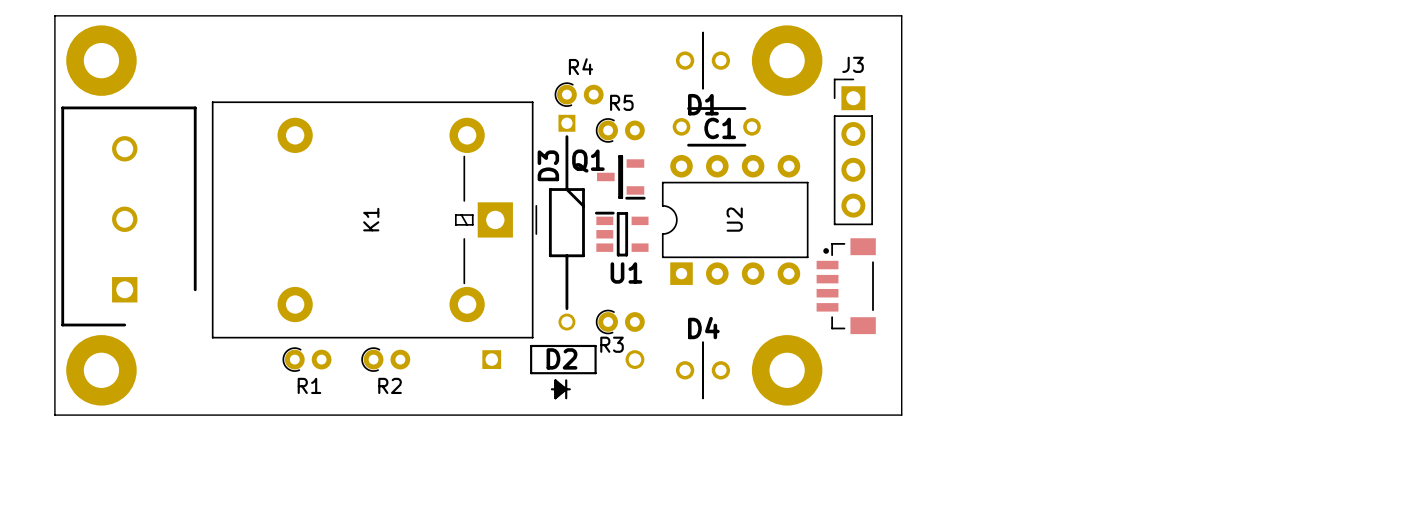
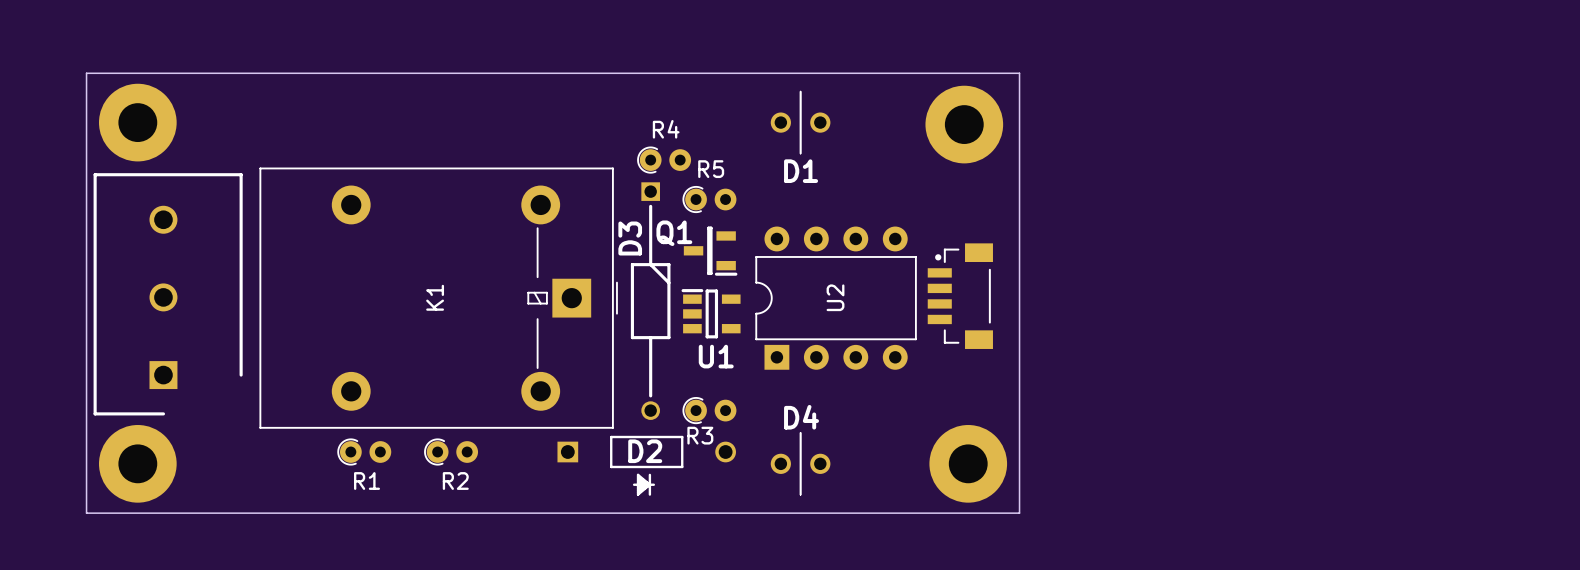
part position: (787, 60) -> (964, 124)
C1: (716, 126) -> none
J3: (853, 151) -> none
part position: (846, 286) -> (960, 296)
part position: (787, 370) -> (968, 463)

